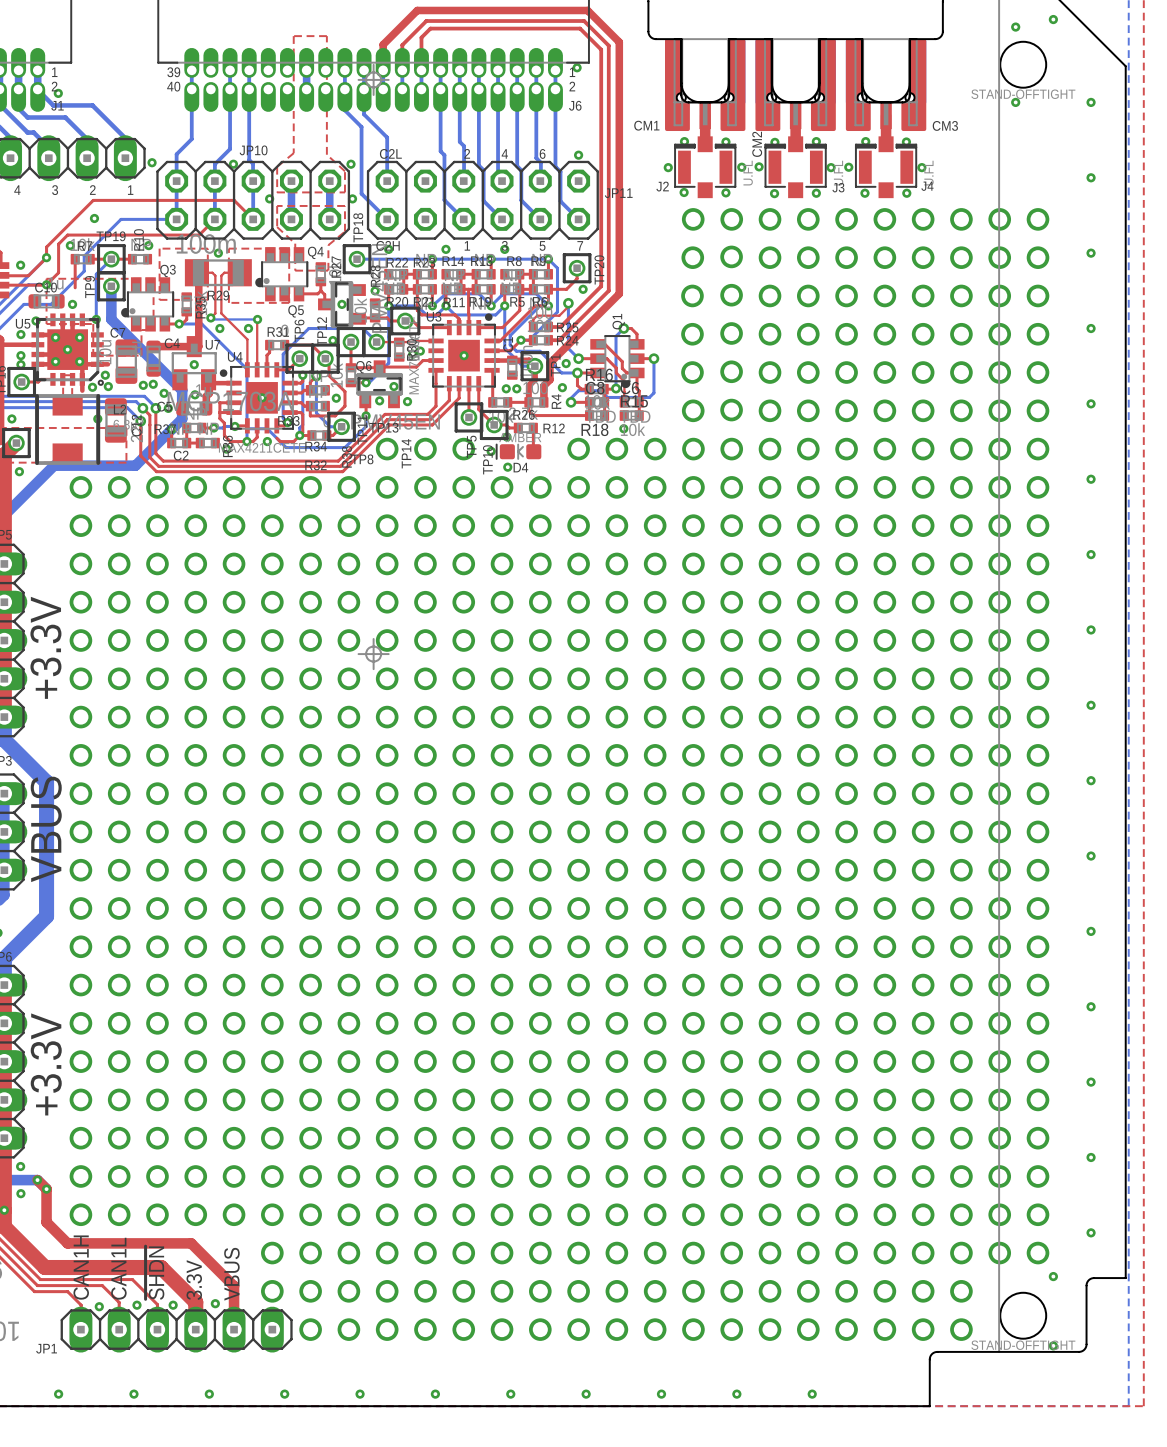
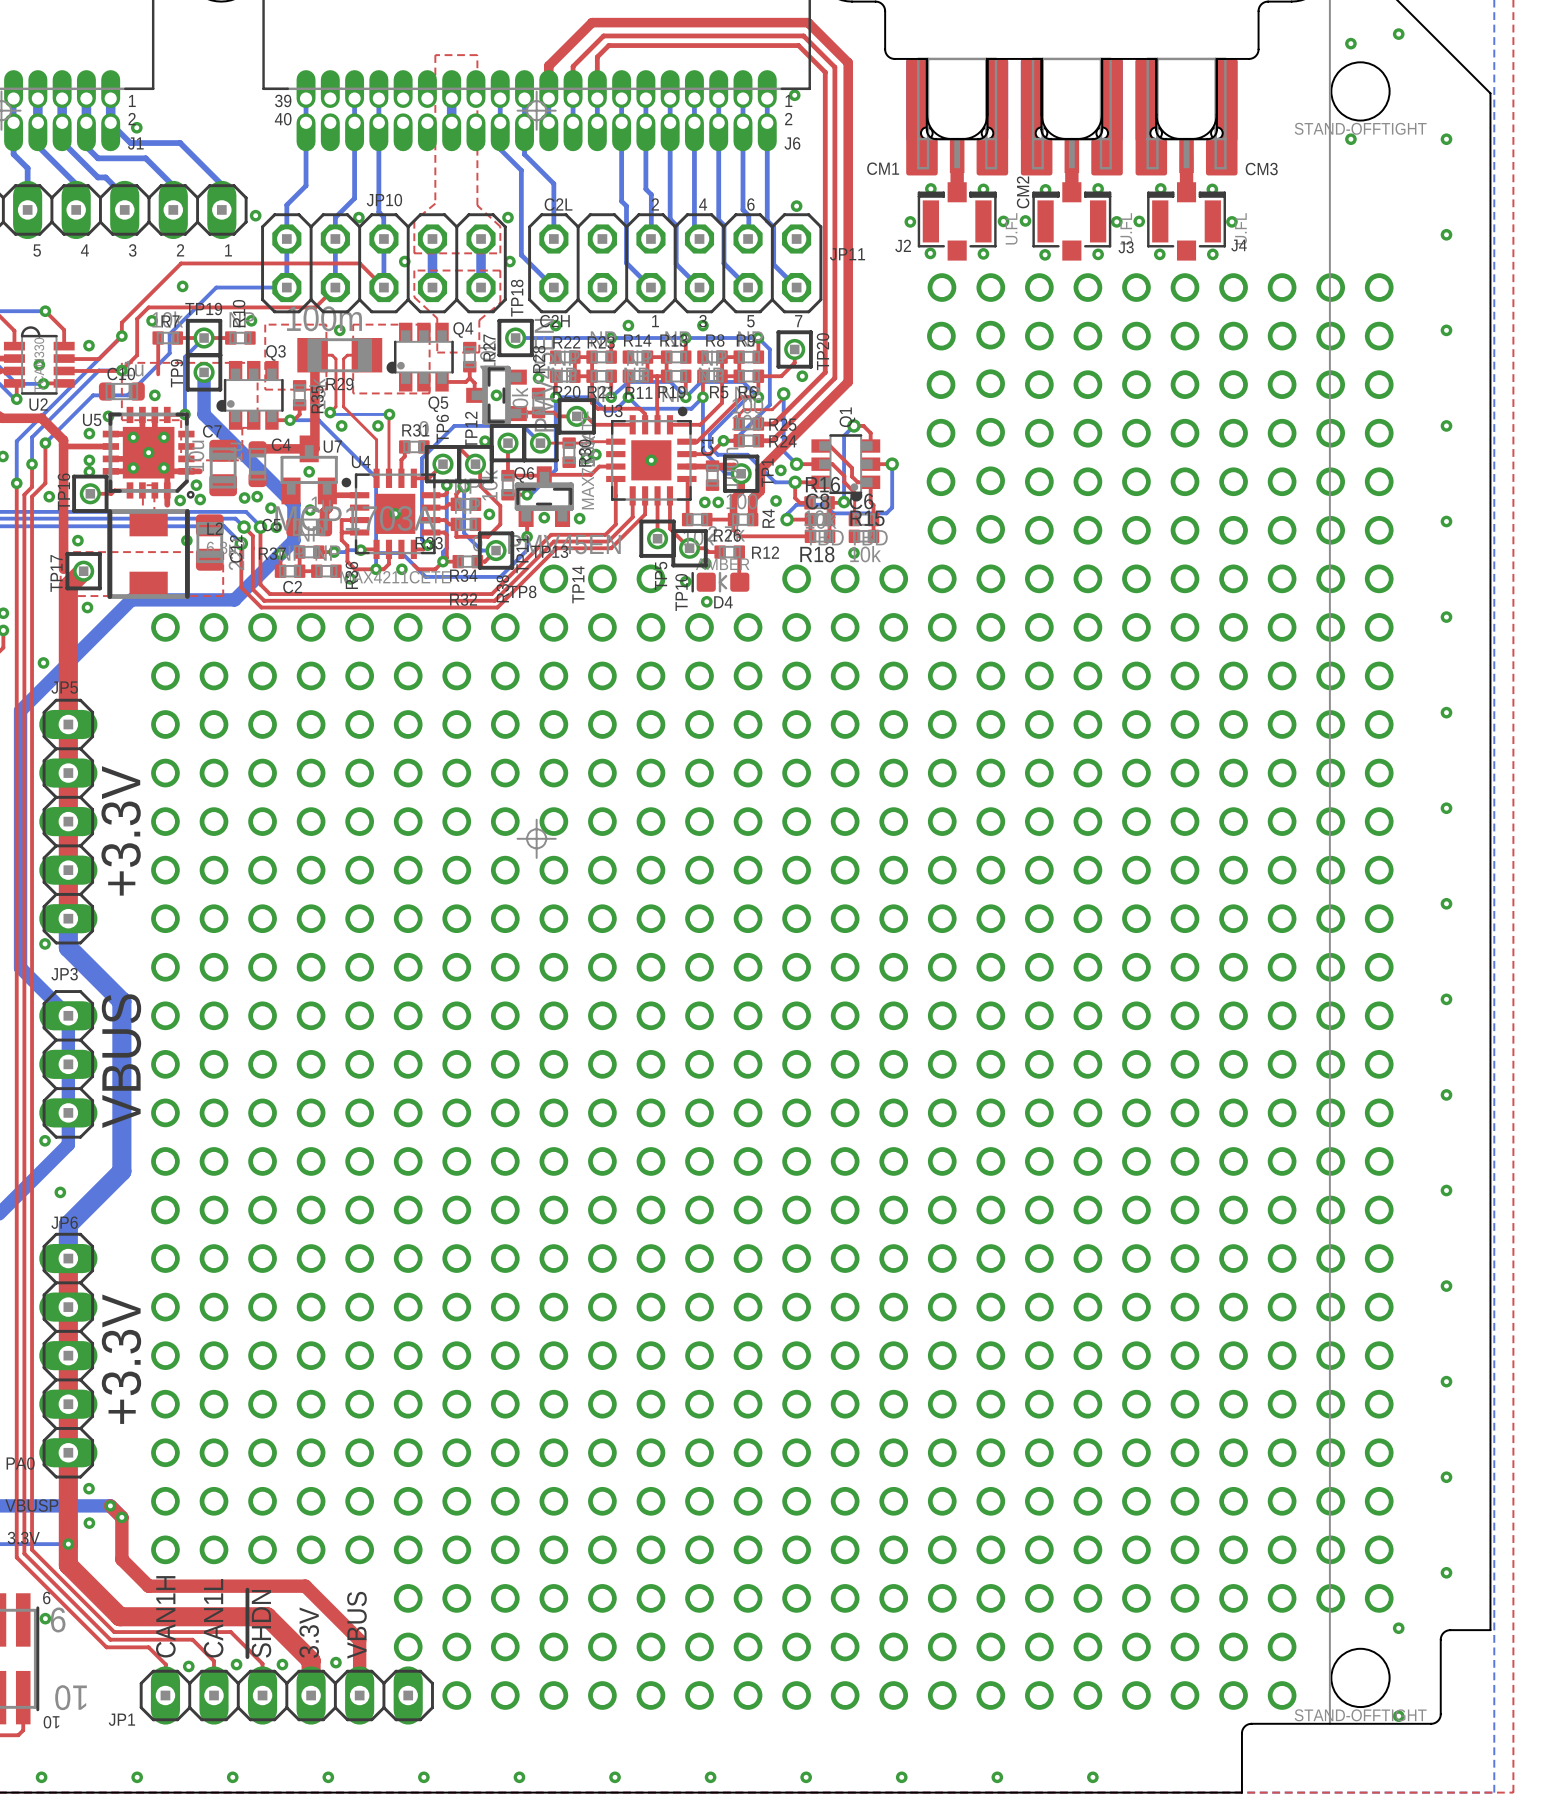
via: (393, 386) -> none

